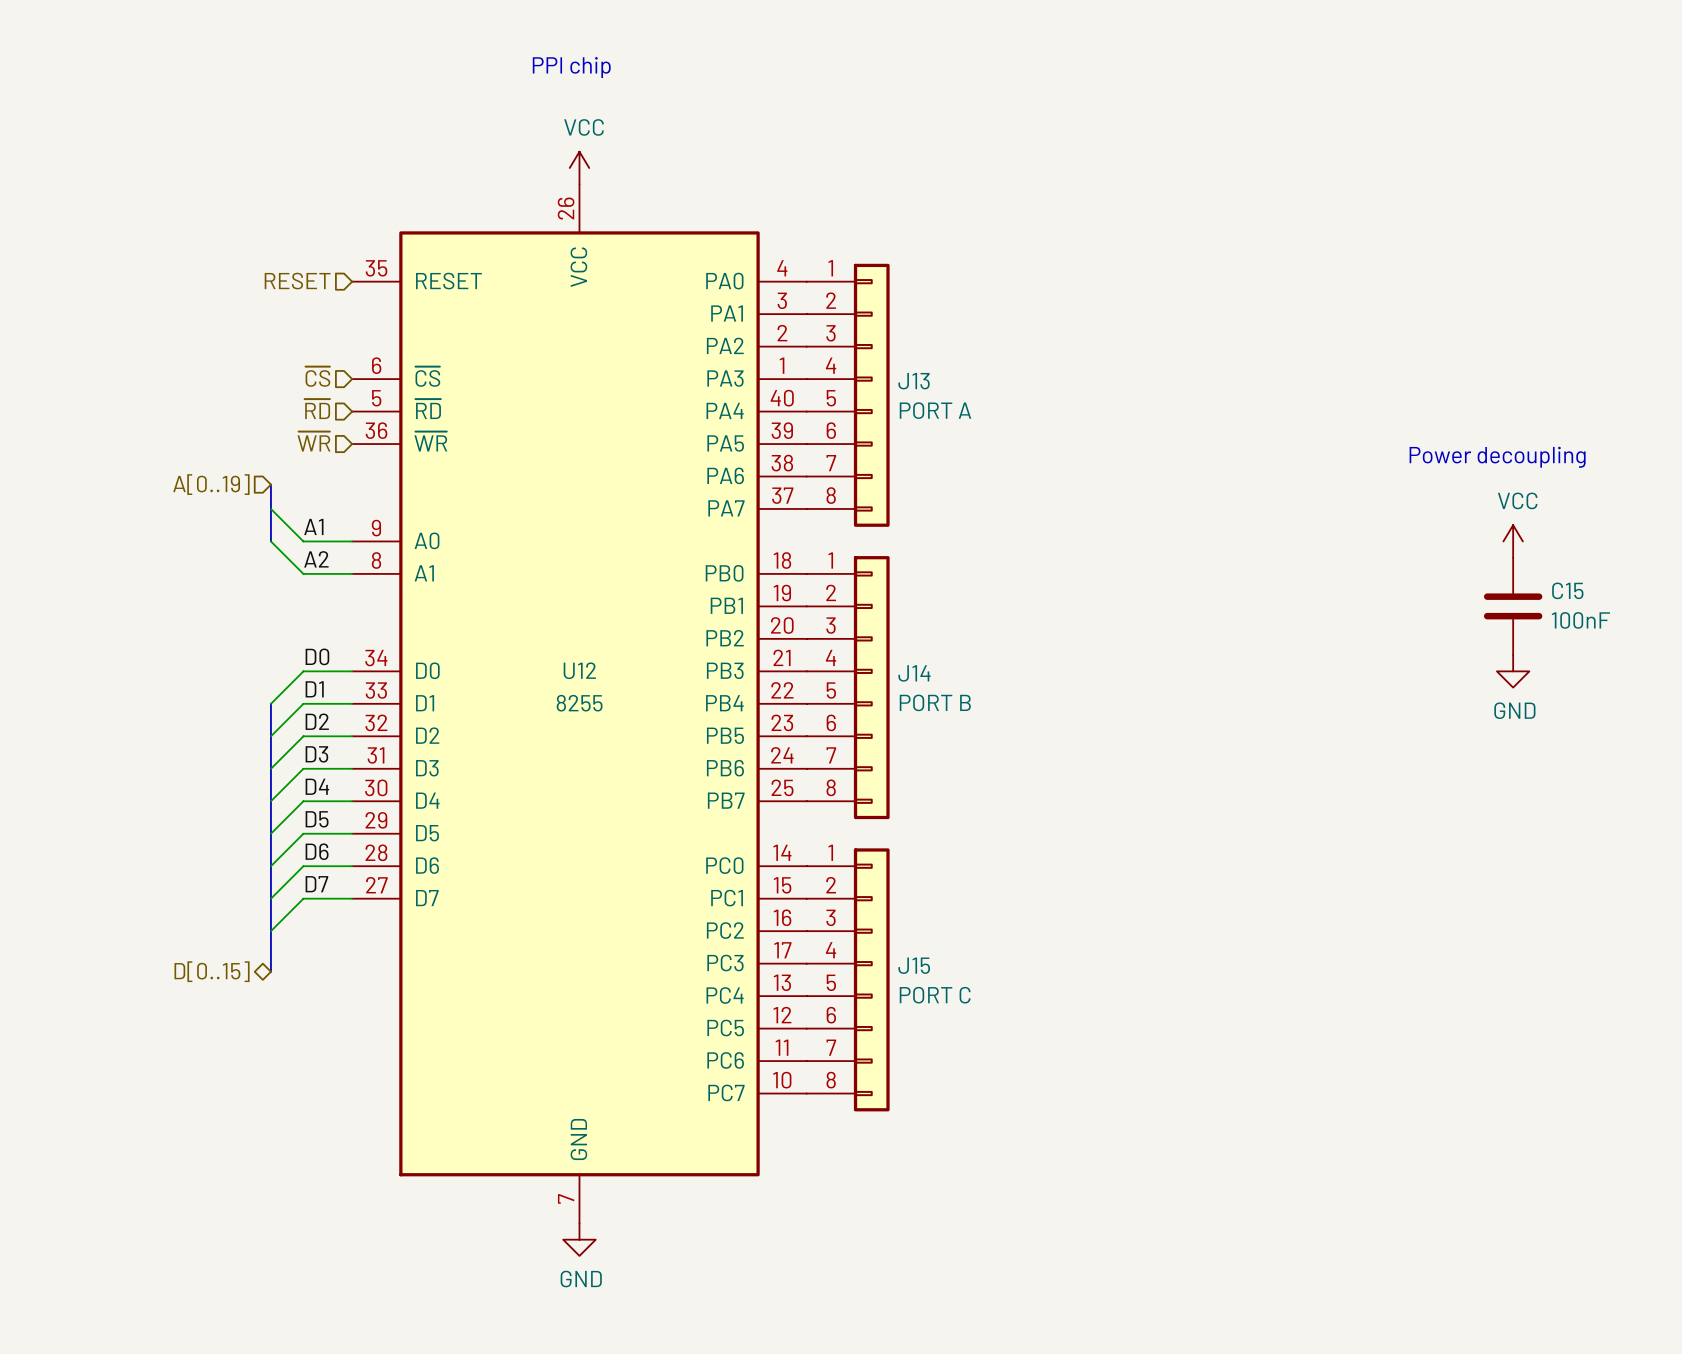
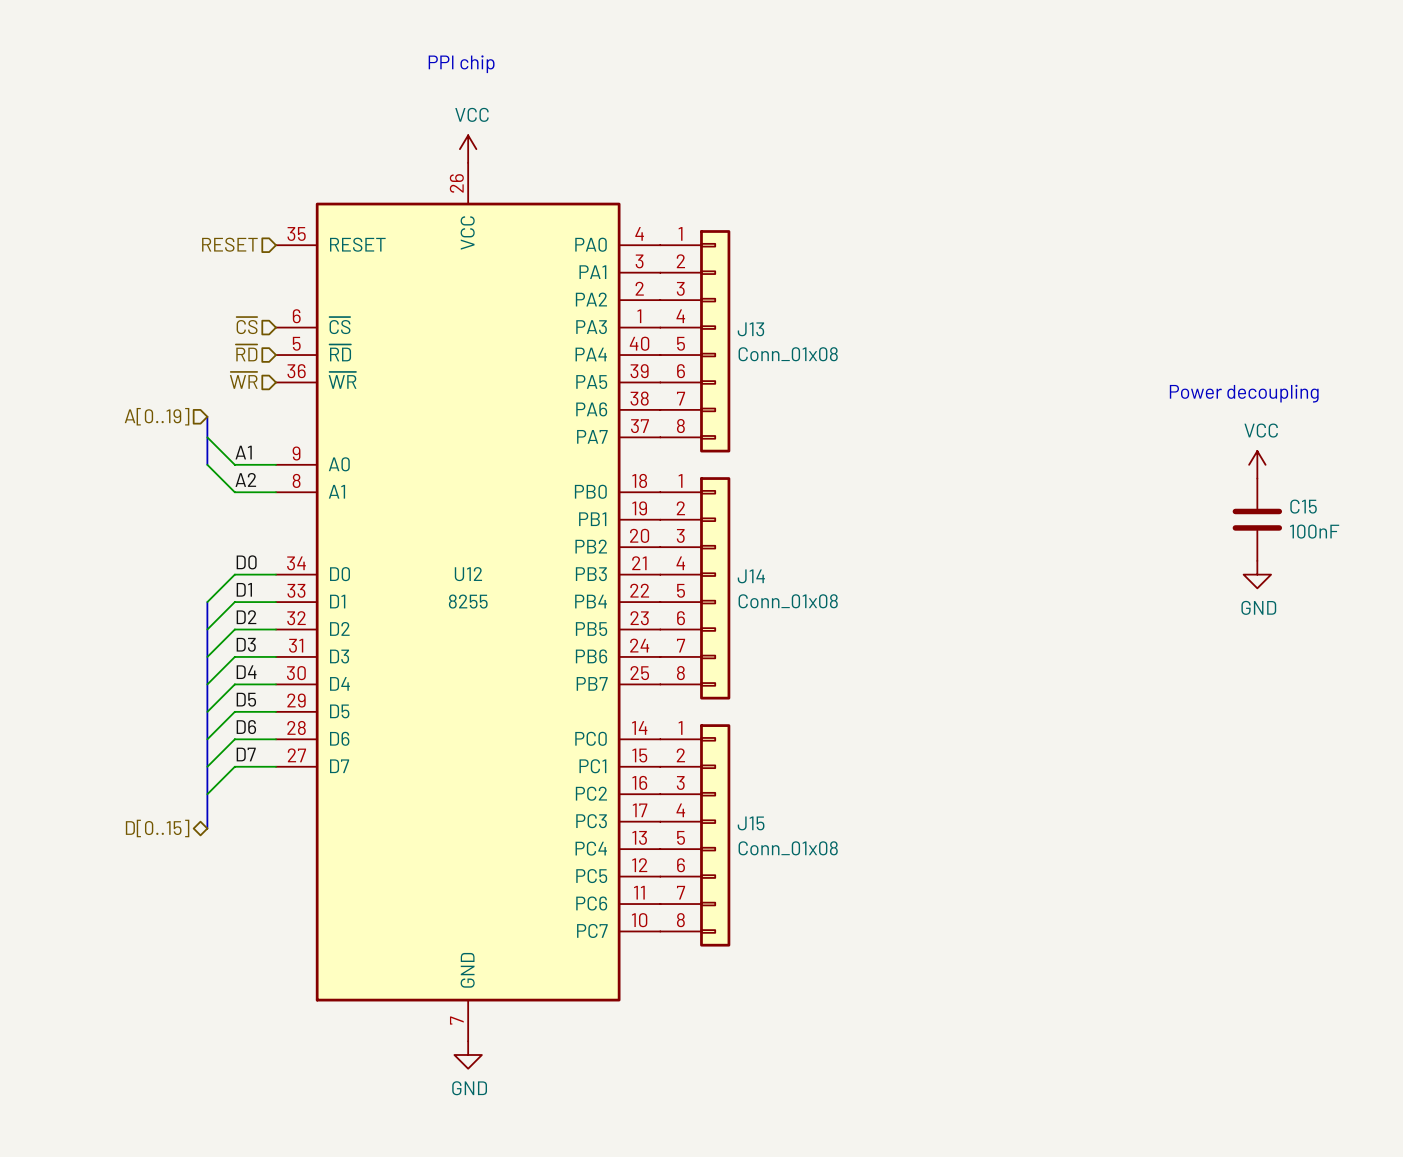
J13 value: PORT A (935, 410) -> Conn_01x08 (788, 354)
J14 value: PORT B (935, 702) -> Conn_01x08 (788, 601)
J15 value: PORT C (935, 995) -> Conn_01x08 (788, 848)

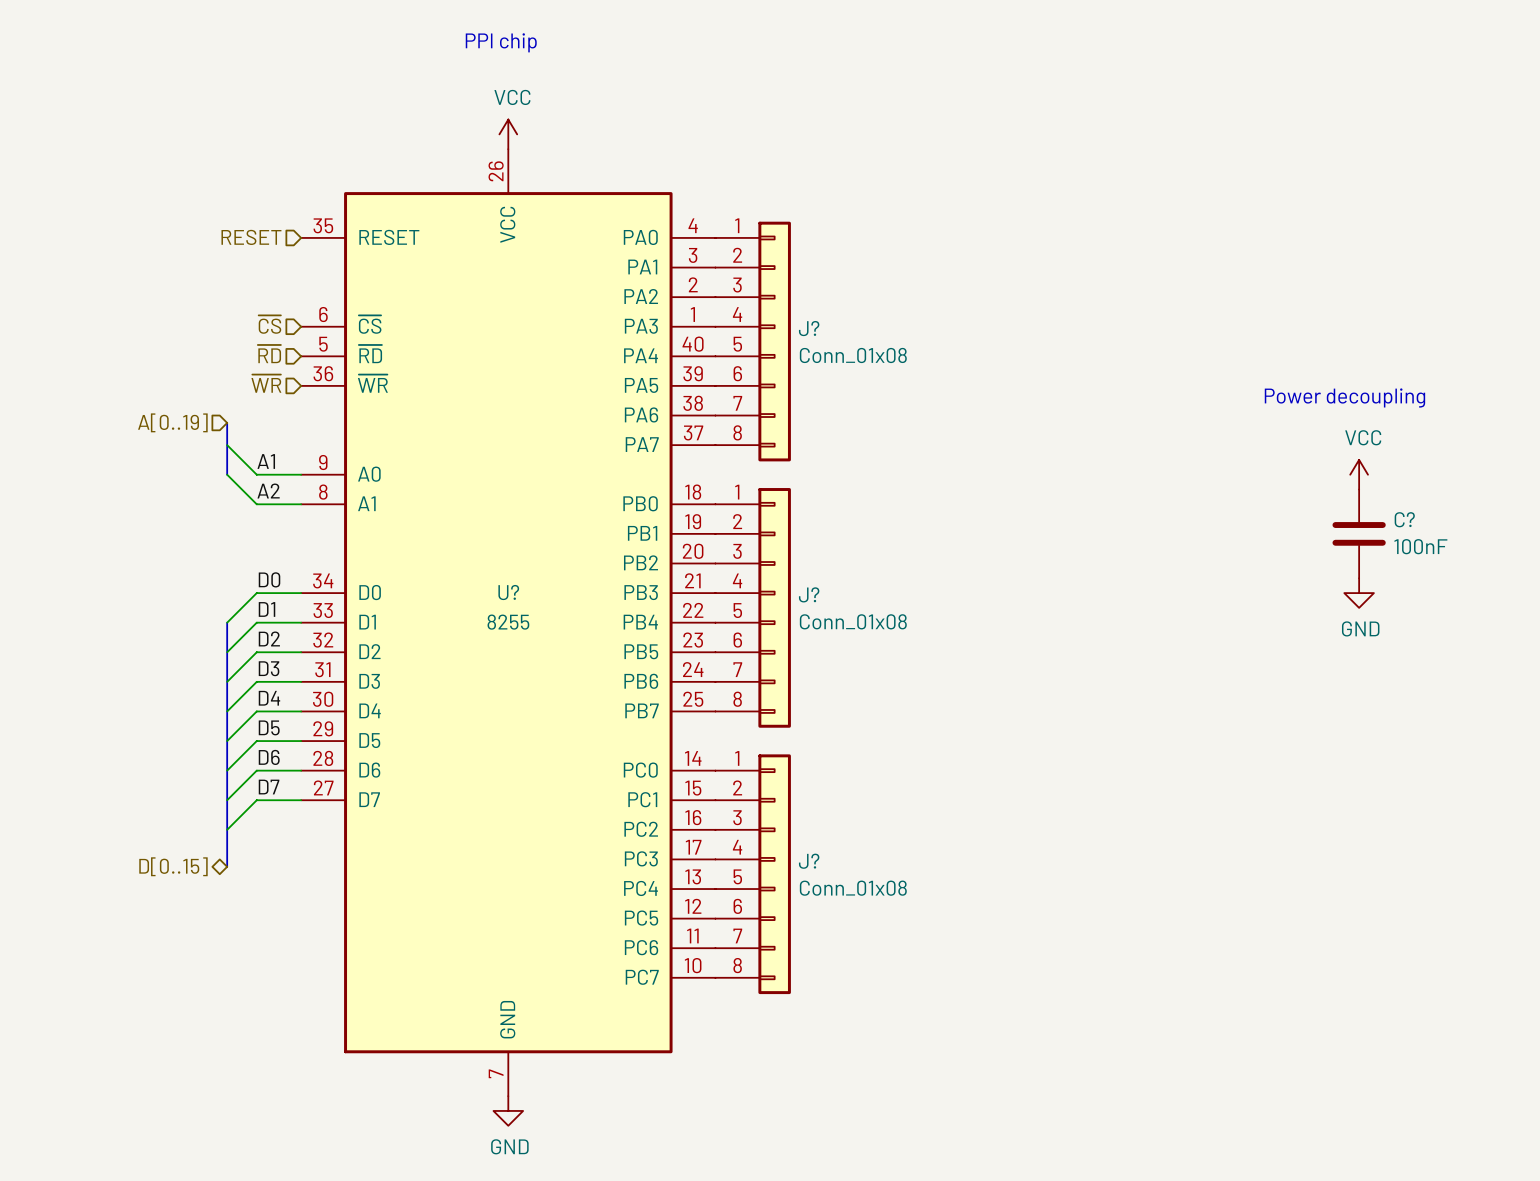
J13 name: J13 (750, 329) -> J? (809, 328)
C15 name: C15 (1303, 506) -> C? (1404, 519)
U12 name: U12 (468, 574) -> U? (508, 592)
J14 name: J14 (751, 576) -> J? (809, 594)
J15 name: J15 (751, 823) -> J? (809, 861)

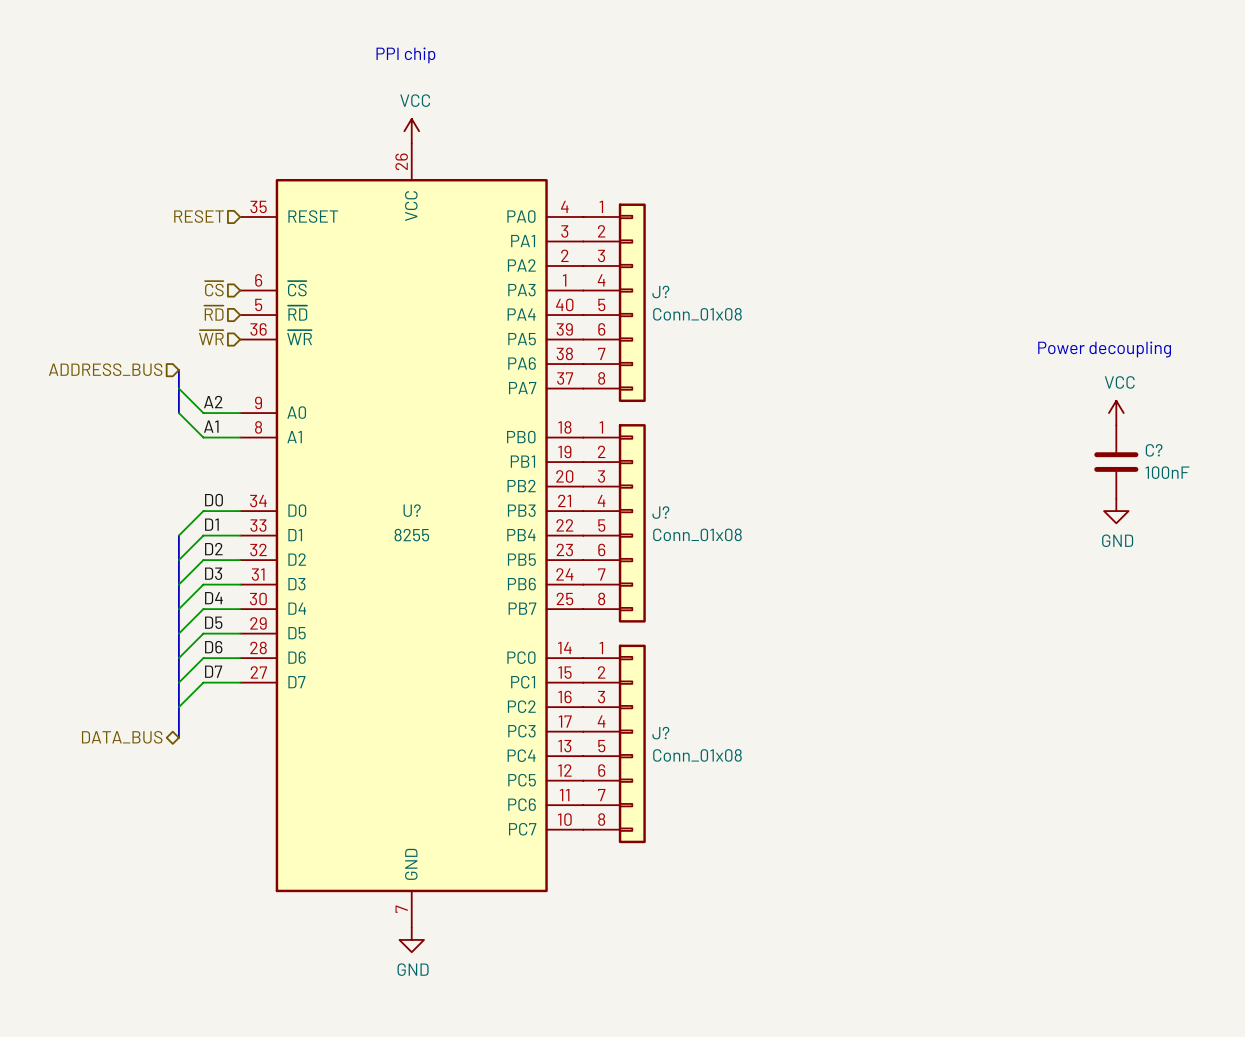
hierarchical label: A[0..19] (172, 422) -> ADDRESS_BUS (105, 369)
label: A1 (266, 461) -> A2 (213, 402)
label: A2 (268, 491) -> A1 (211, 426)
hierarchical label: D[0..15] (173, 866) -> DATA_BUS (122, 737)

